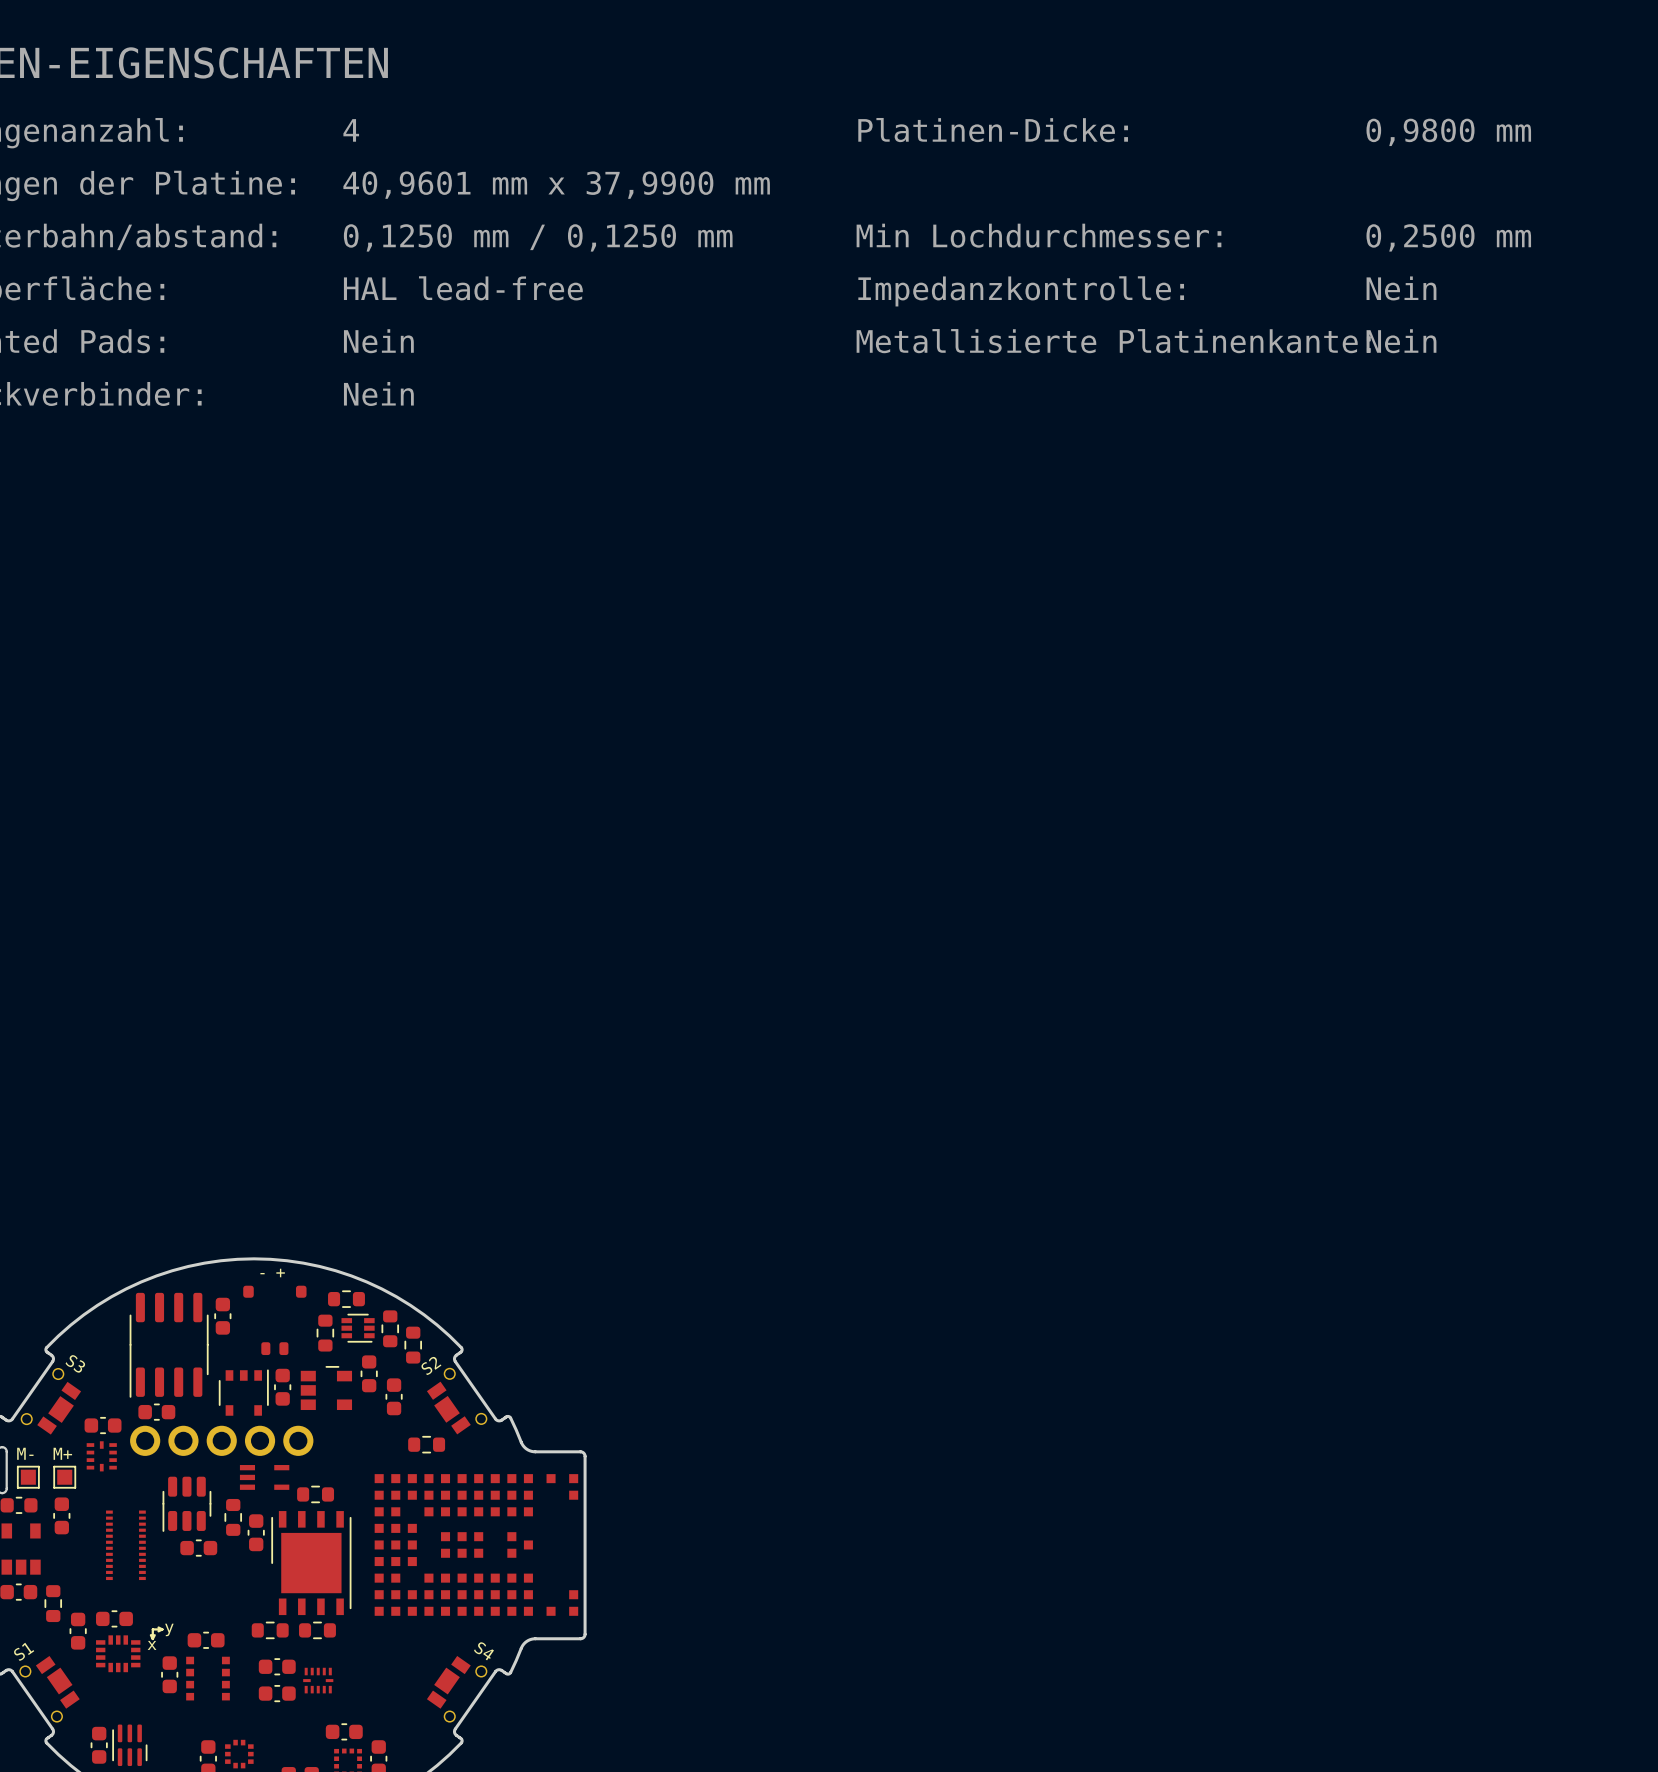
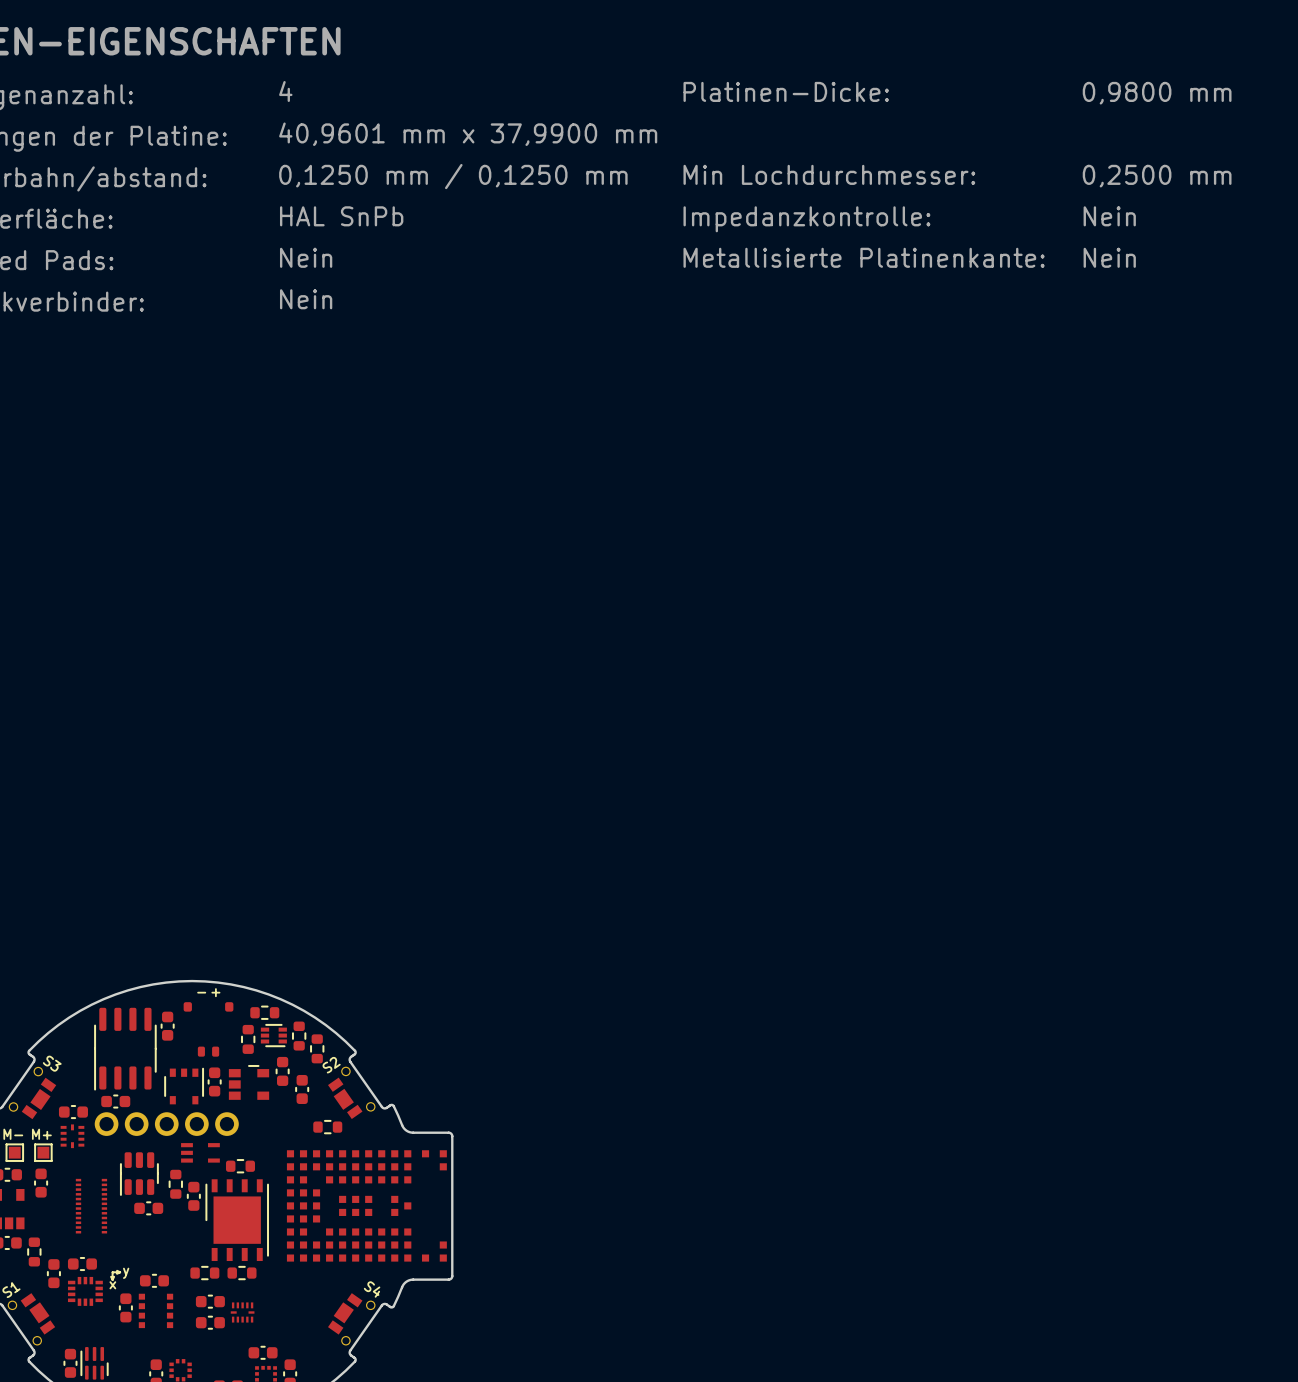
text position: 4 (351, 130) -> 4 (285, 91)
text position: Platinen-Dicke: (993, 130) -> Platinen-Dicke: (786, 91)
text position: 0,9800 mm (1448, 132) -> 0,9800 mm (1157, 93)
text position: 40,9601 mm x 37,9900 mm (556, 185) -> 40,9601 mm x 37,9900 mm (468, 134)
text position: Min Lochdurchmesser: (1038, 235) -> Min Lochdurchmesser: (829, 174)
text position: 0,1250 mm / 0,1250 mm (538, 237) -> 0,1250 mm / 0,1250 mm (453, 176)
text position: 0,2500 mm (1448, 237) -> 0,2500 mm (1157, 176)
text: none -> HAL SnPb (341, 216)
text: HAL lead-free (463, 288) -> none
text position: Nein (1401, 288) -> Nein (1109, 216)
text position: Impedanzkontrolle: (1021, 291) -> Impedanzkontrolle: (806, 219)
text position: Nein (378, 341) -> Nein (306, 257)
text position: Metallisierte Platinenkante: (1113, 341) -> Metallisierte Platinenkante: (864, 257)
text position: Nein (1401, 341) -> Nein (1109, 257)
text position: Nein (378, 393) -> Nein (306, 299)

